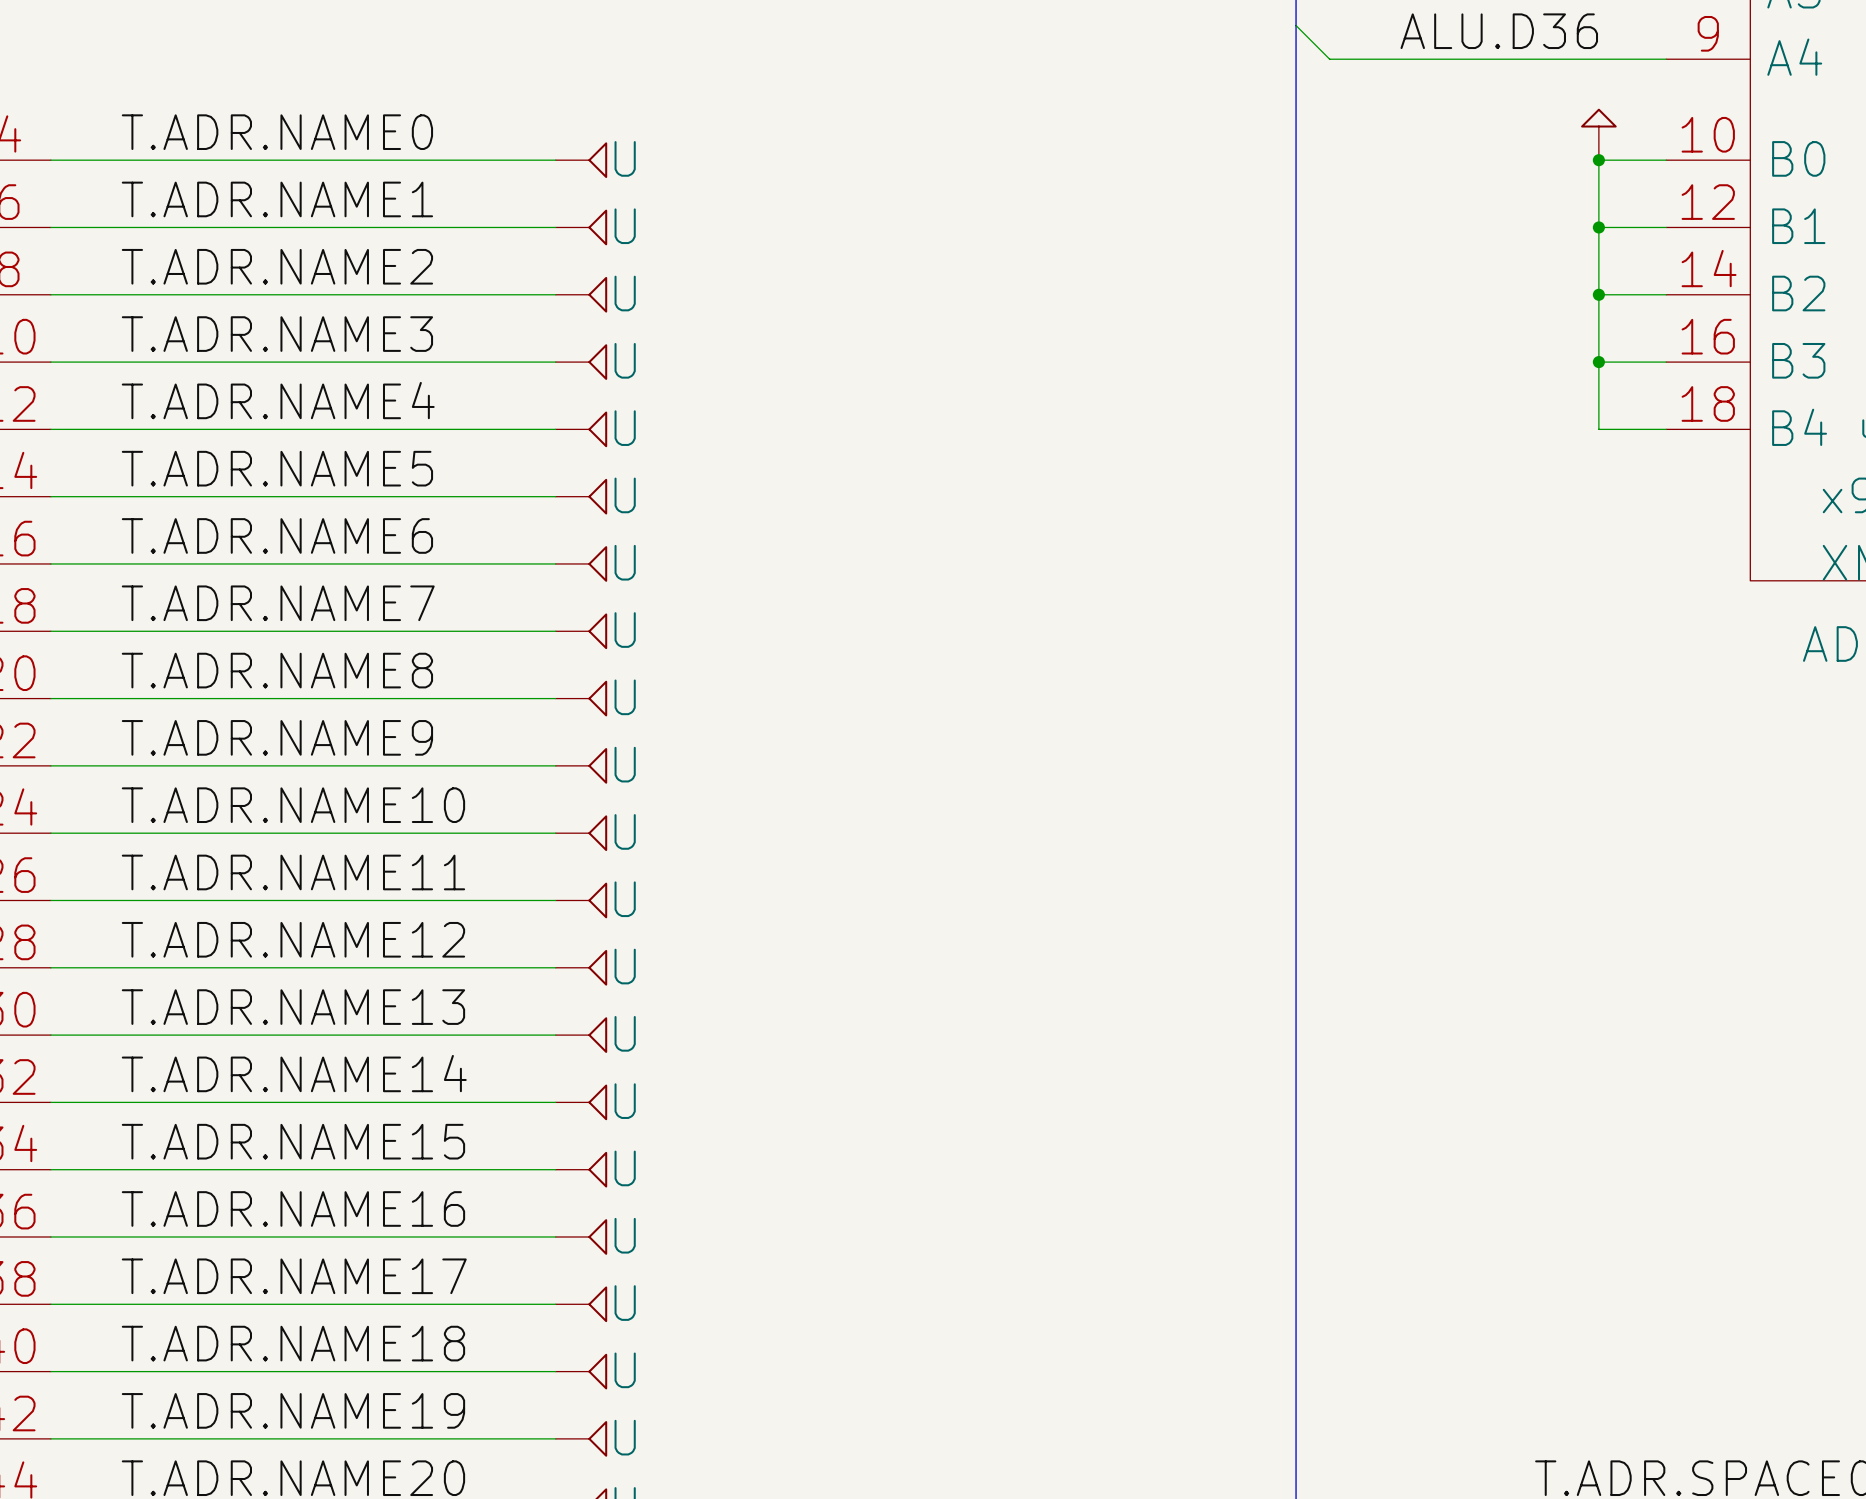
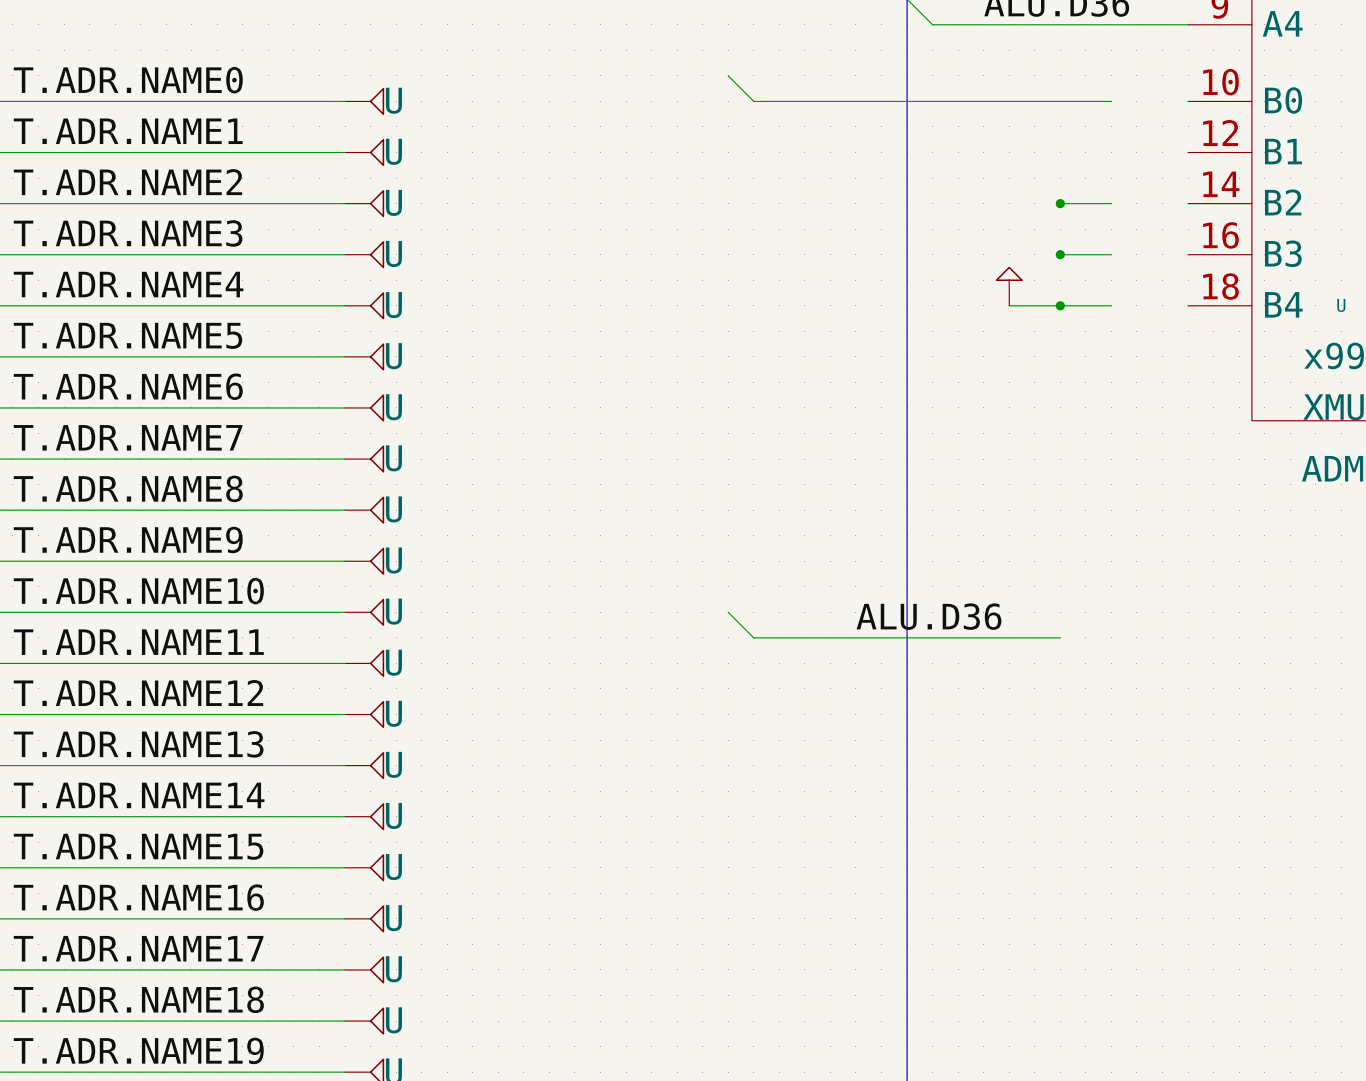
wire: none -> (728, 75) (753, 101) (1111, 101)
power symbol: (1598, 134) -> none
junction: (1598, 160) -> none
wire: (1666, 160) (1598, 160) (1598, 429) (1666, 429) -> none
wire: (1598, 227) (1666, 227) -> none
junction: (1598, 227) -> none
junction: none -> (1060, 203)
wire: (1598, 294) (1666, 294) -> (1060, 203) (1111, 203)
junction: (1598, 294) -> none
junction: none -> (1060, 254)
wire: (1598, 362) (1666, 362) -> (1060, 254) (1111, 254)
junction: (1598, 362) -> none
power symbol: none -> (1009, 286)
wire: none -> (1009, 305) (1111, 305)
junction: none -> (1060, 305)
wire: none -> (728, 612) (753, 637) (1060, 637)
label: none -> ALU.D36 (928, 616)

